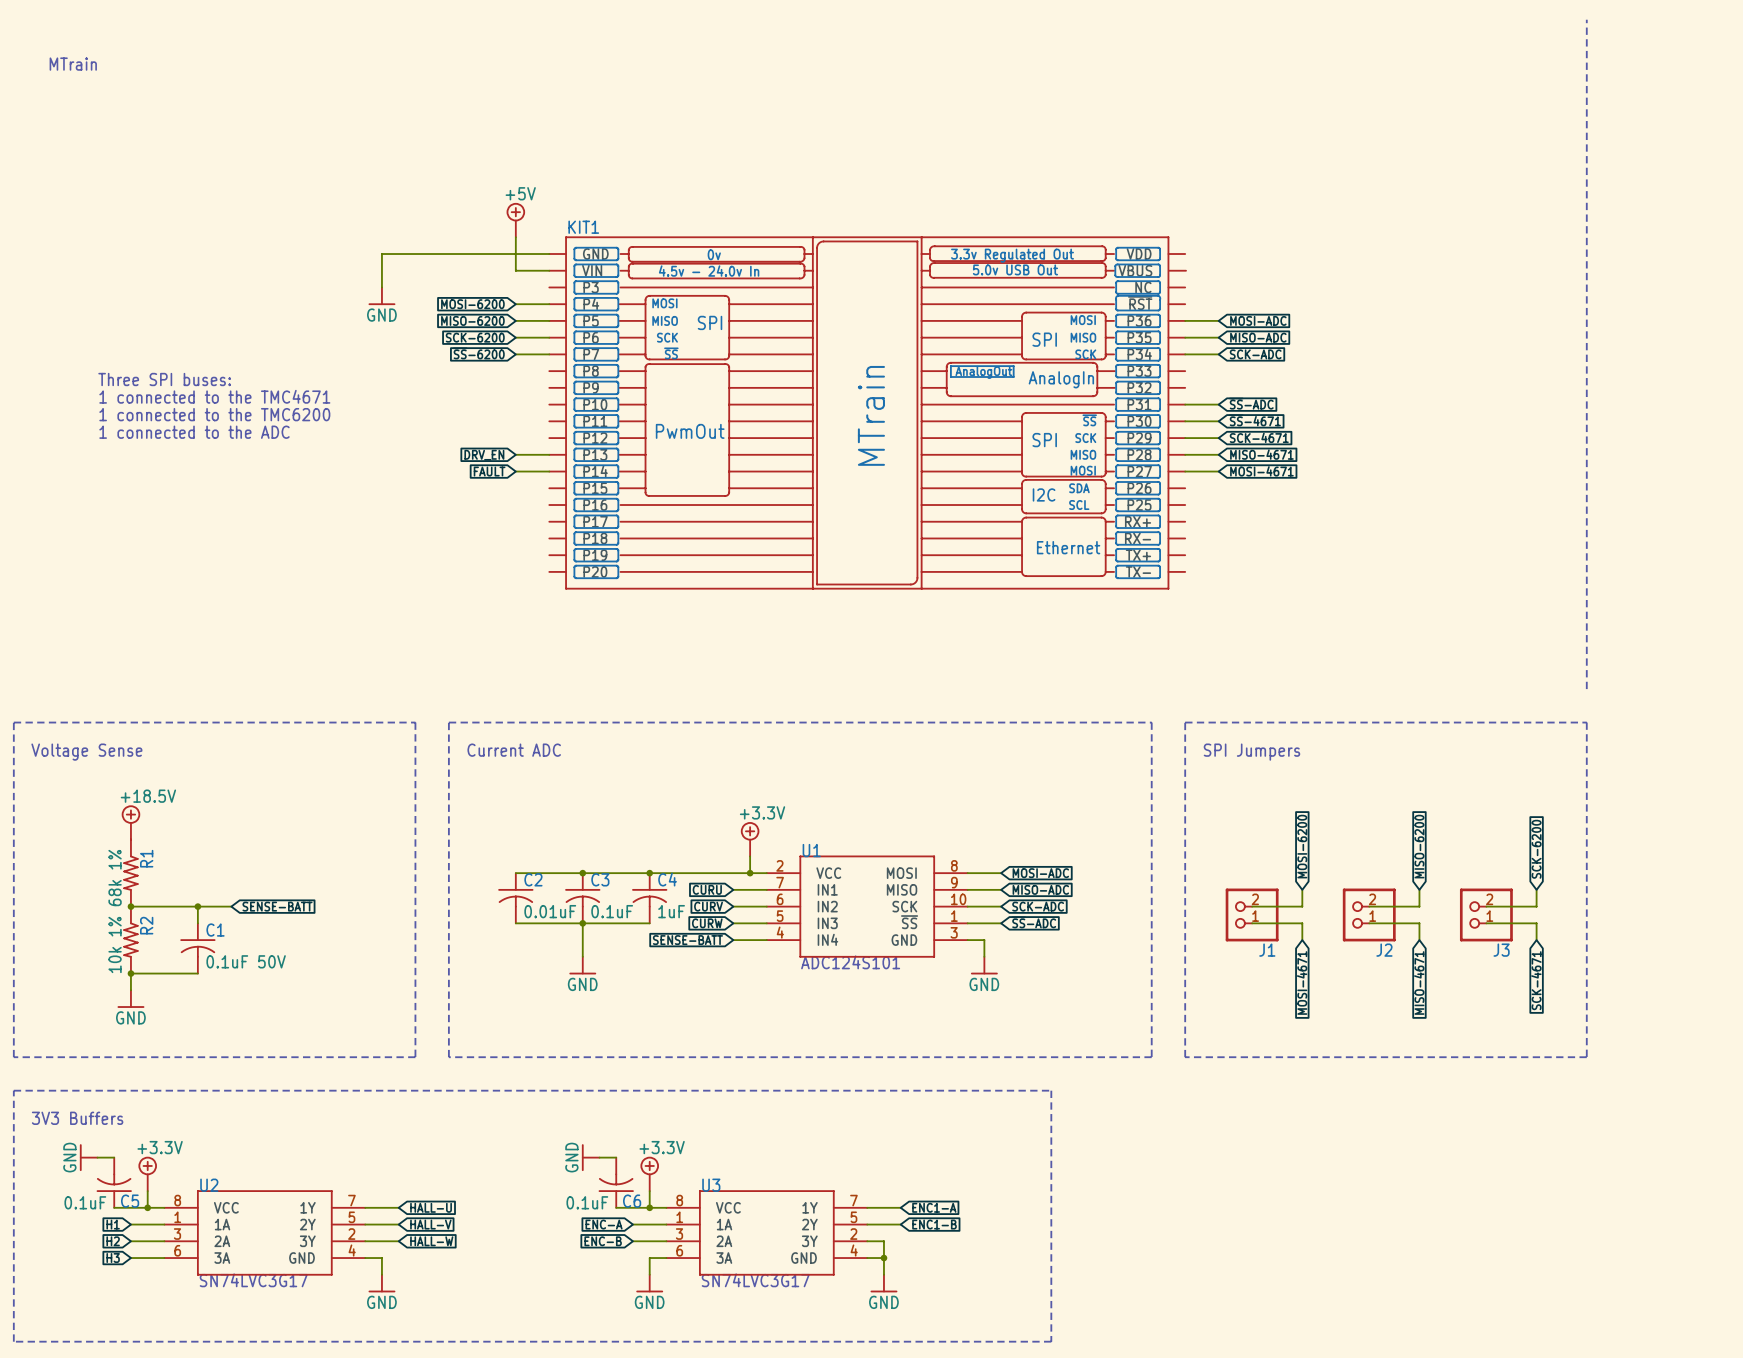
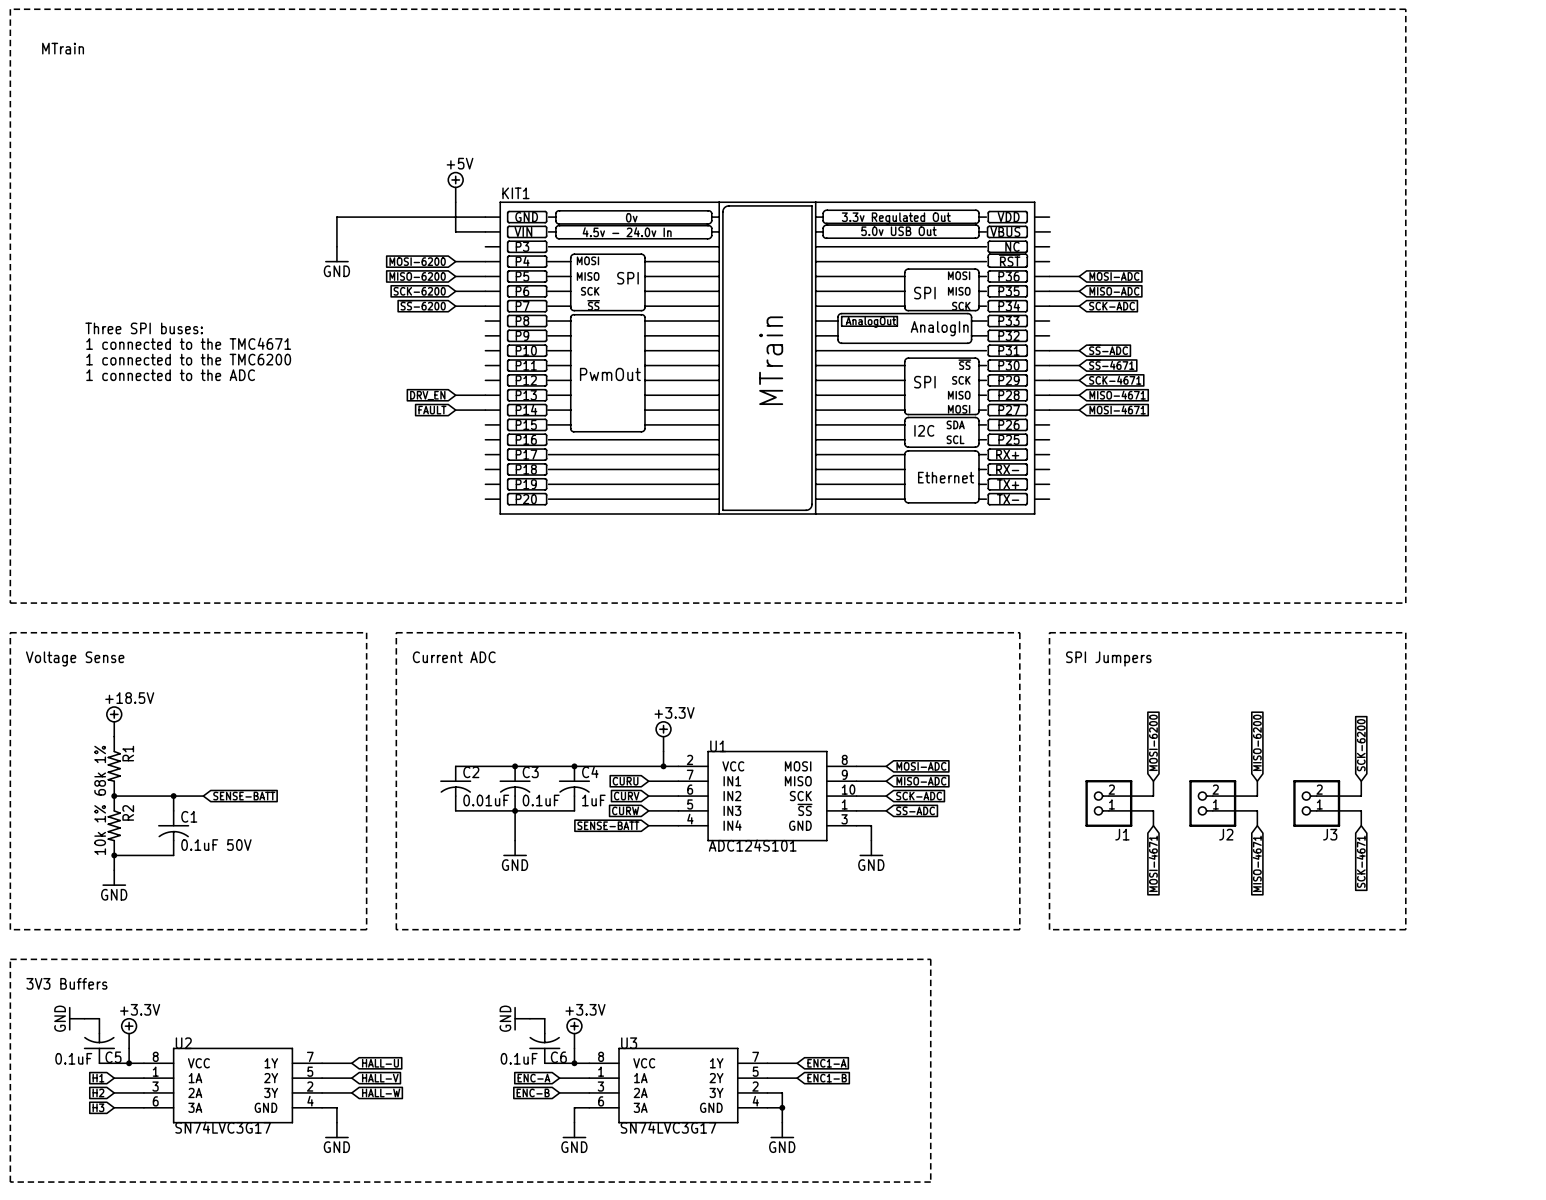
line: none -> (1405, 9) (10, 9) (10, 603) (1405, 603)

